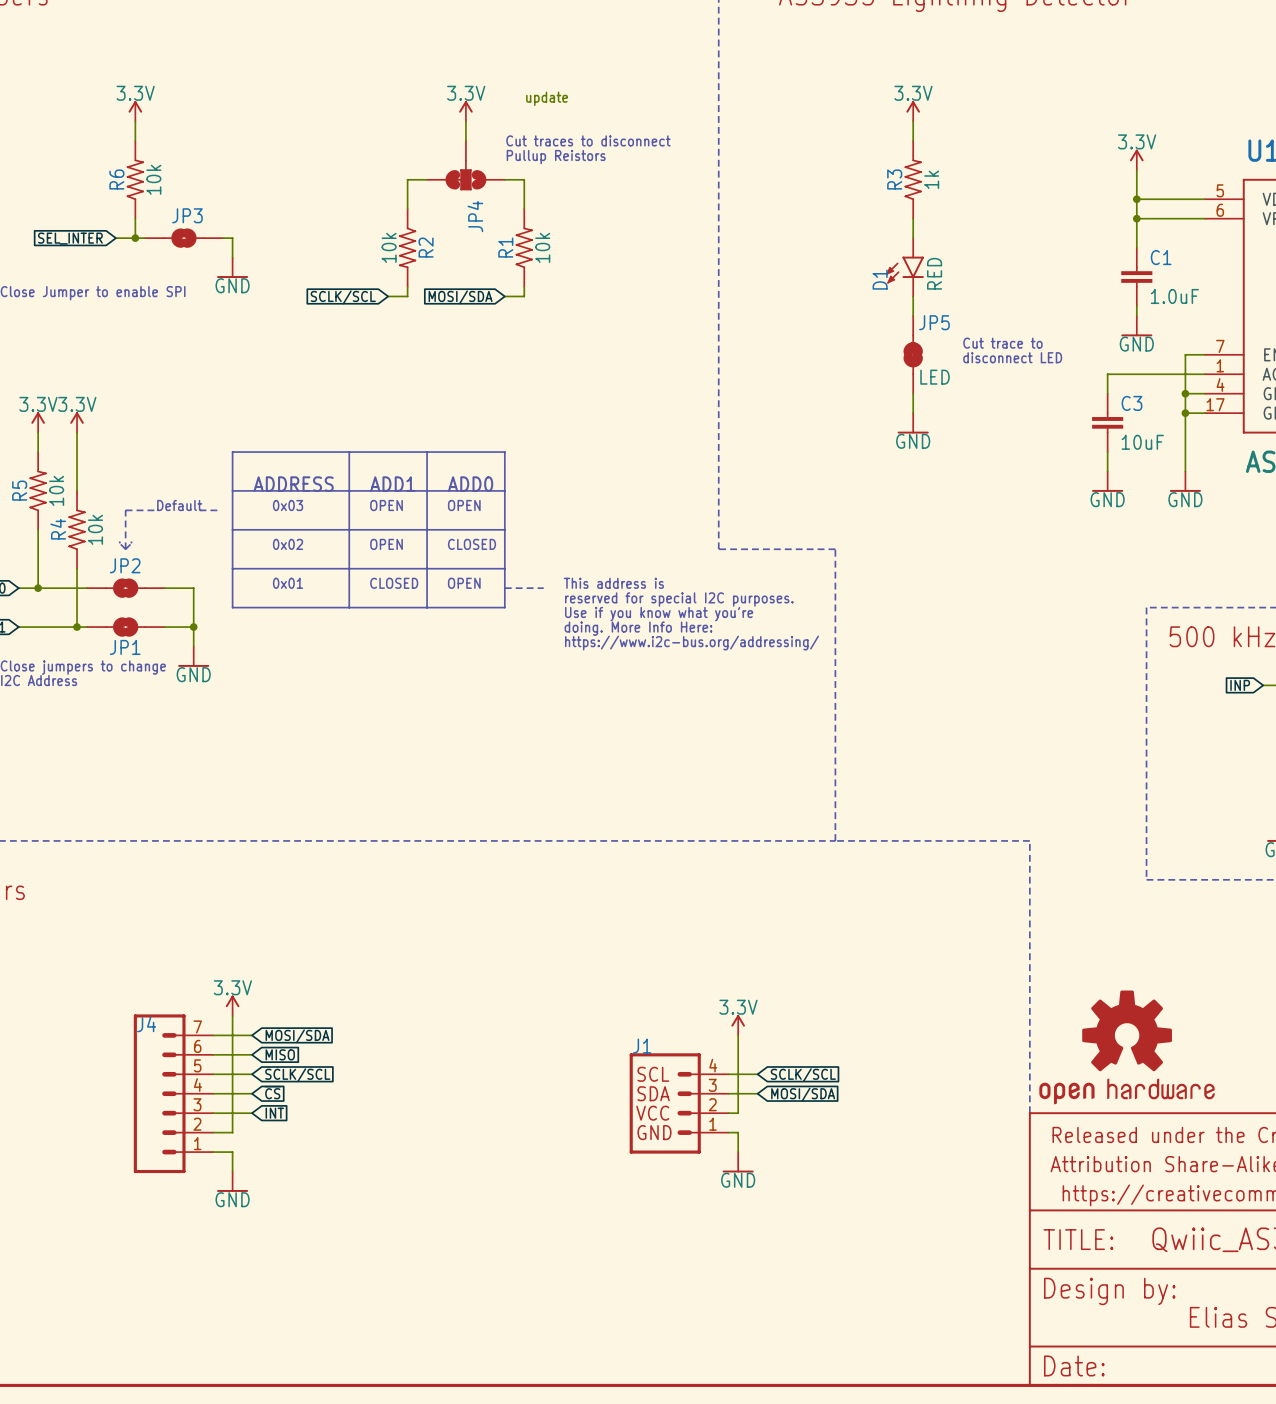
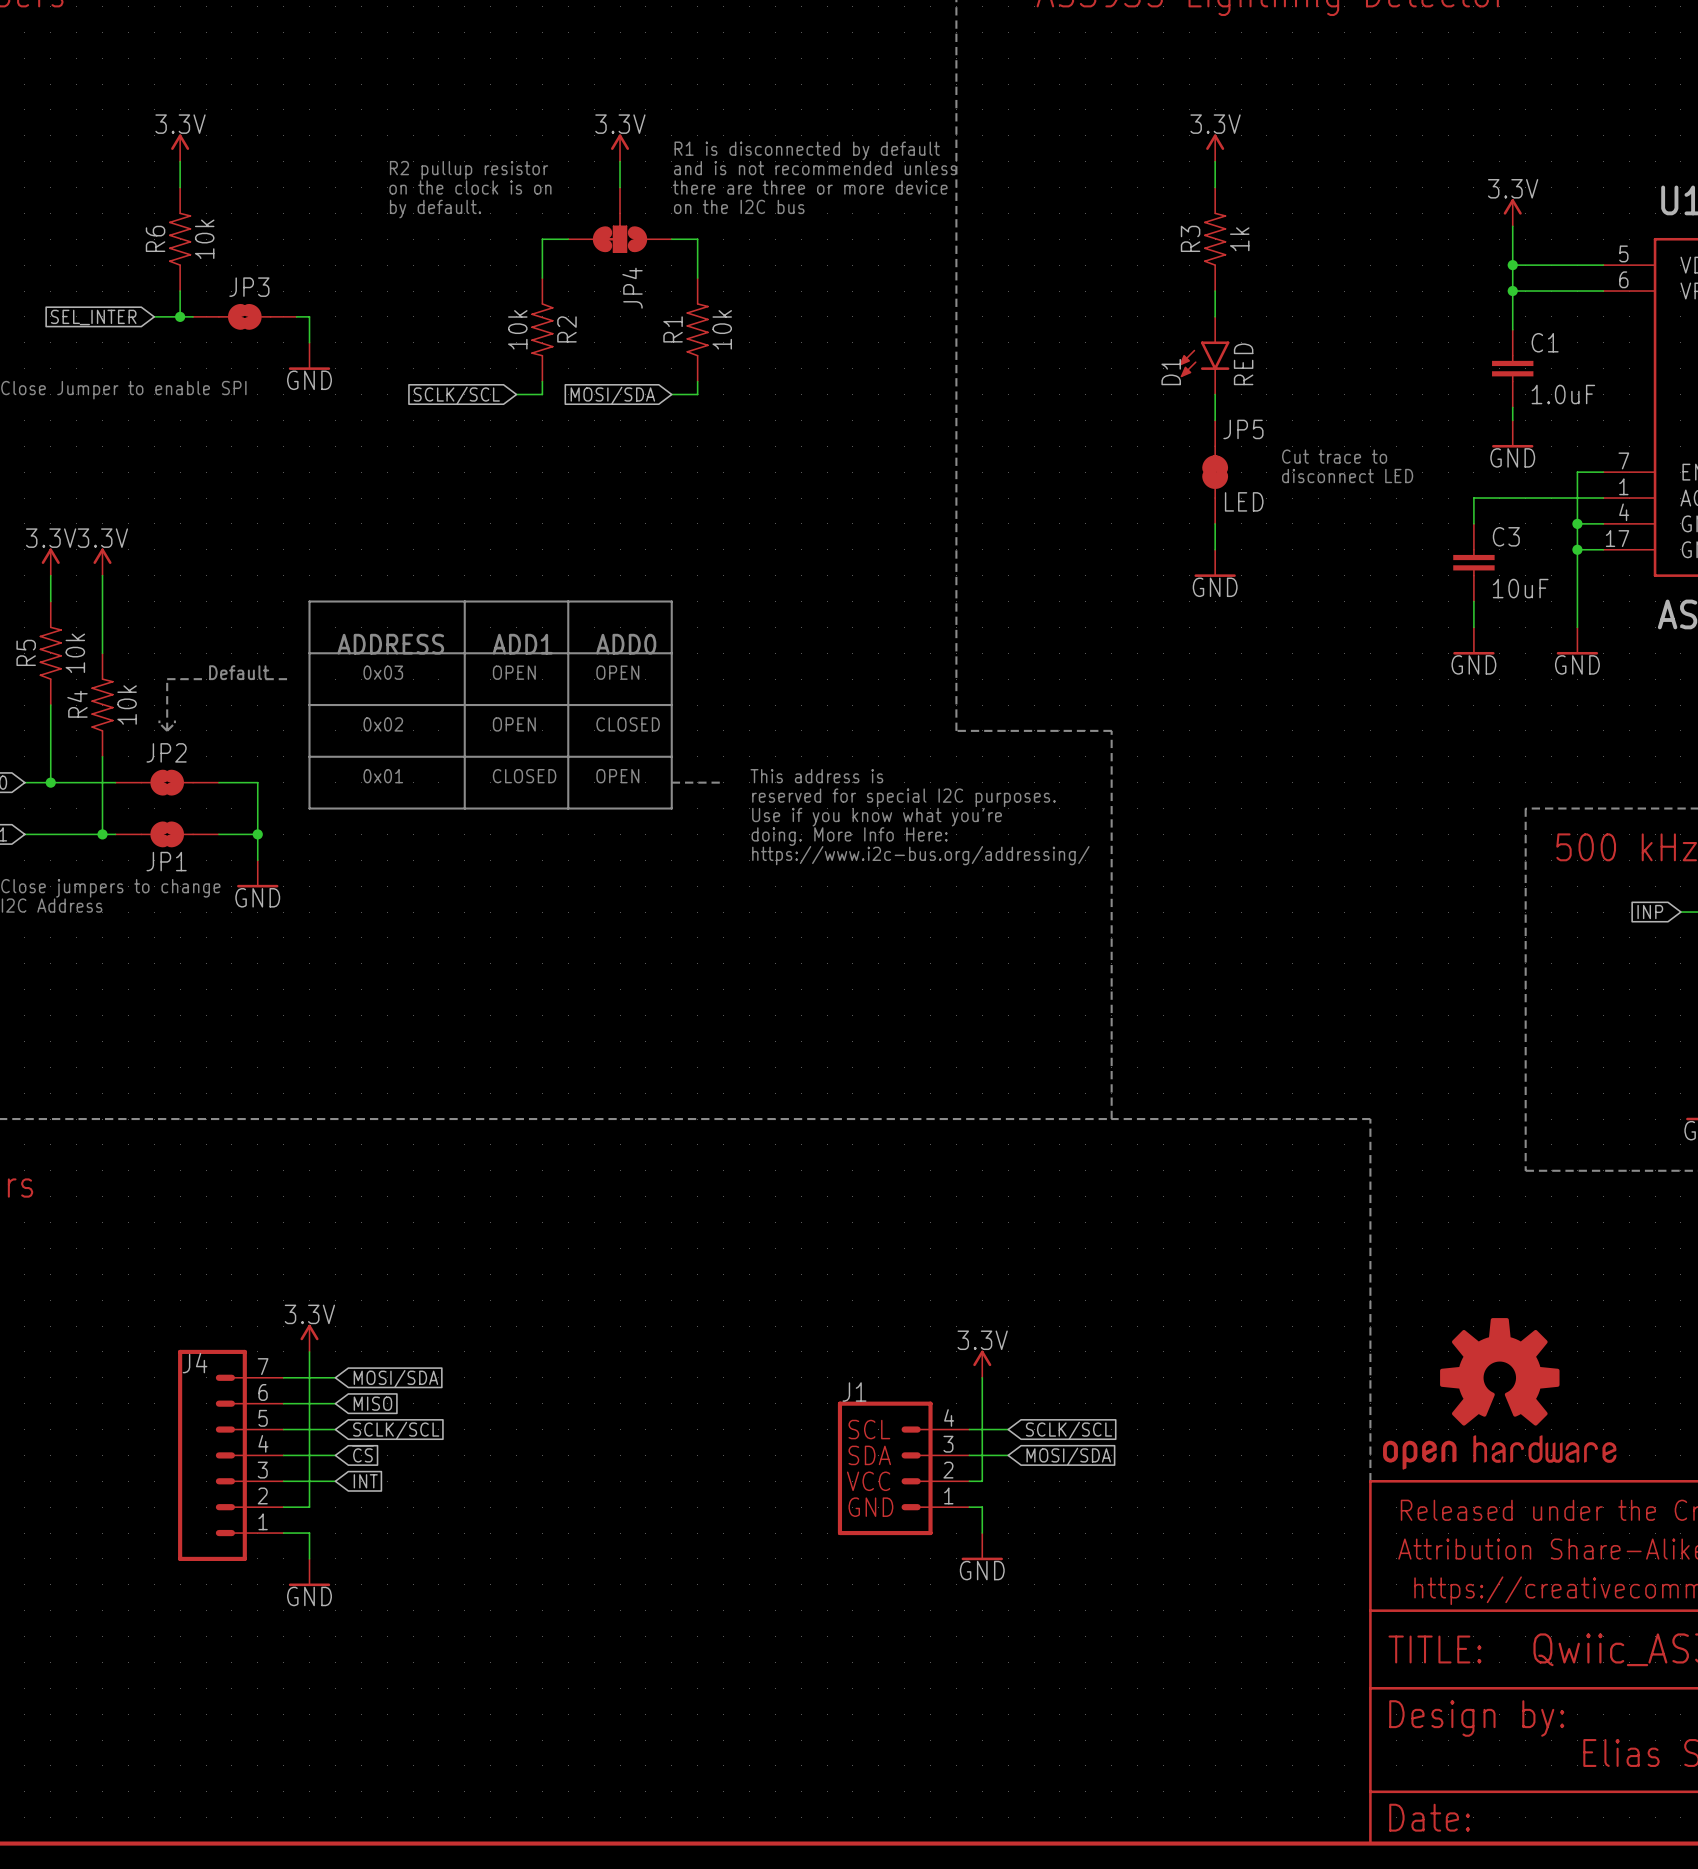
text: update (547, 98) -> none
text: none -> R1 is disconnected by default (807, 150)
text: none -> and is not recommended unless (815, 168)
text: none -> R2 pullup resistor (469, 170)
text: none -> on the clock is on (470, 187)
text: Cut traces to disconnect (588, 140) -> there are three or more device (810, 187)
text: none -> by default. (435, 209)
text: Pullup Reistors (556, 157) -> on the I2C bus (739, 206)

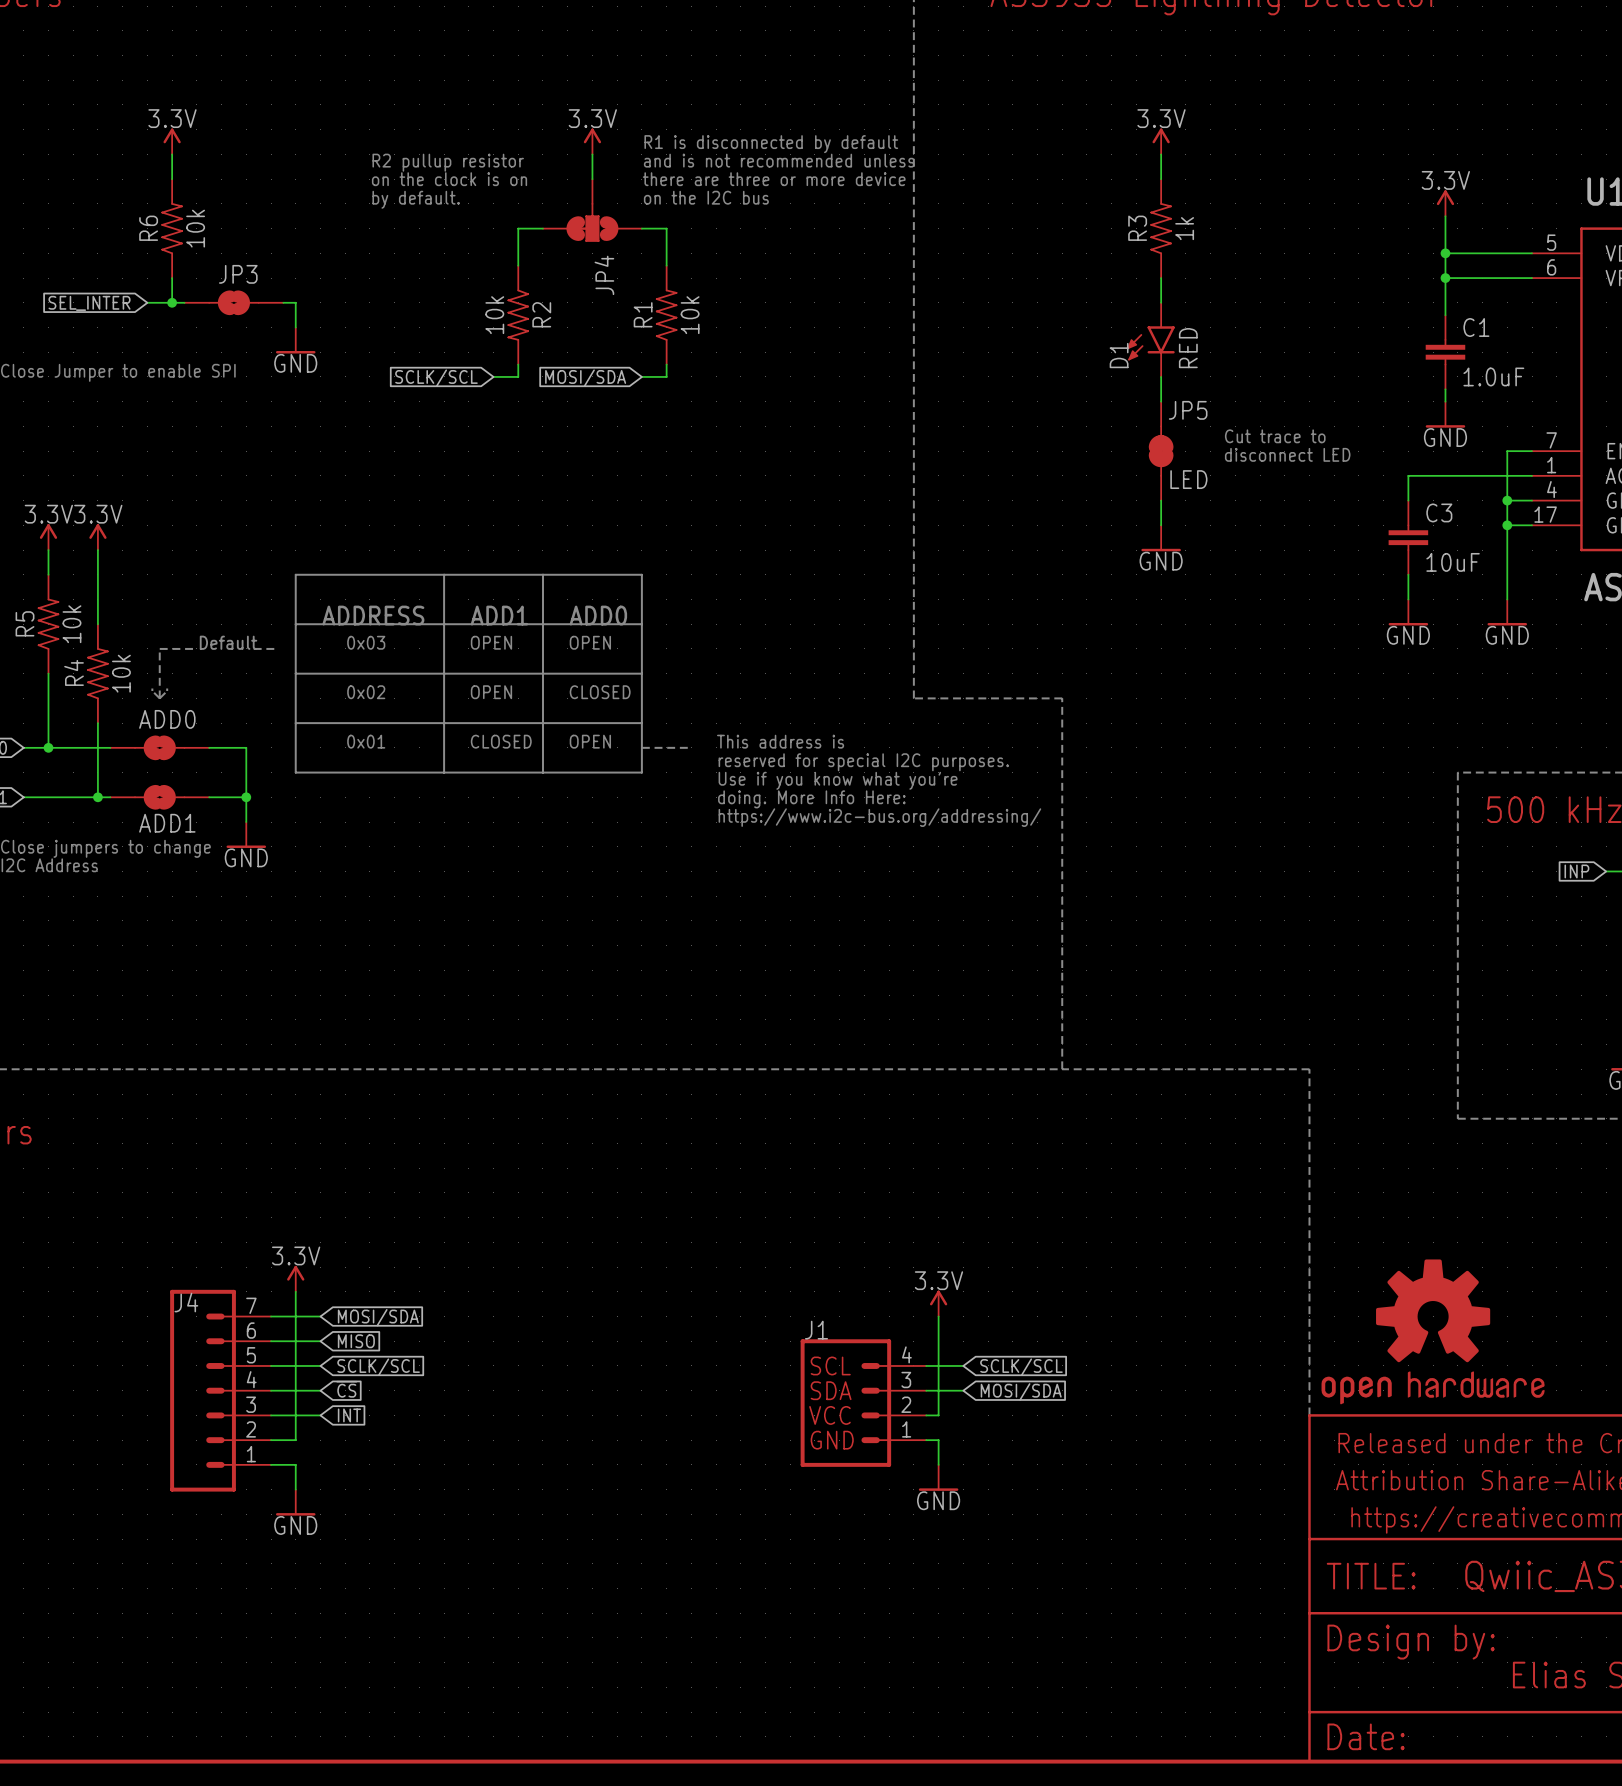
JP2 name: JP2 (166, 752) -> ADD0 (167, 719)
JP1 name: JP1 (166, 861) -> ADD1 (167, 823)

